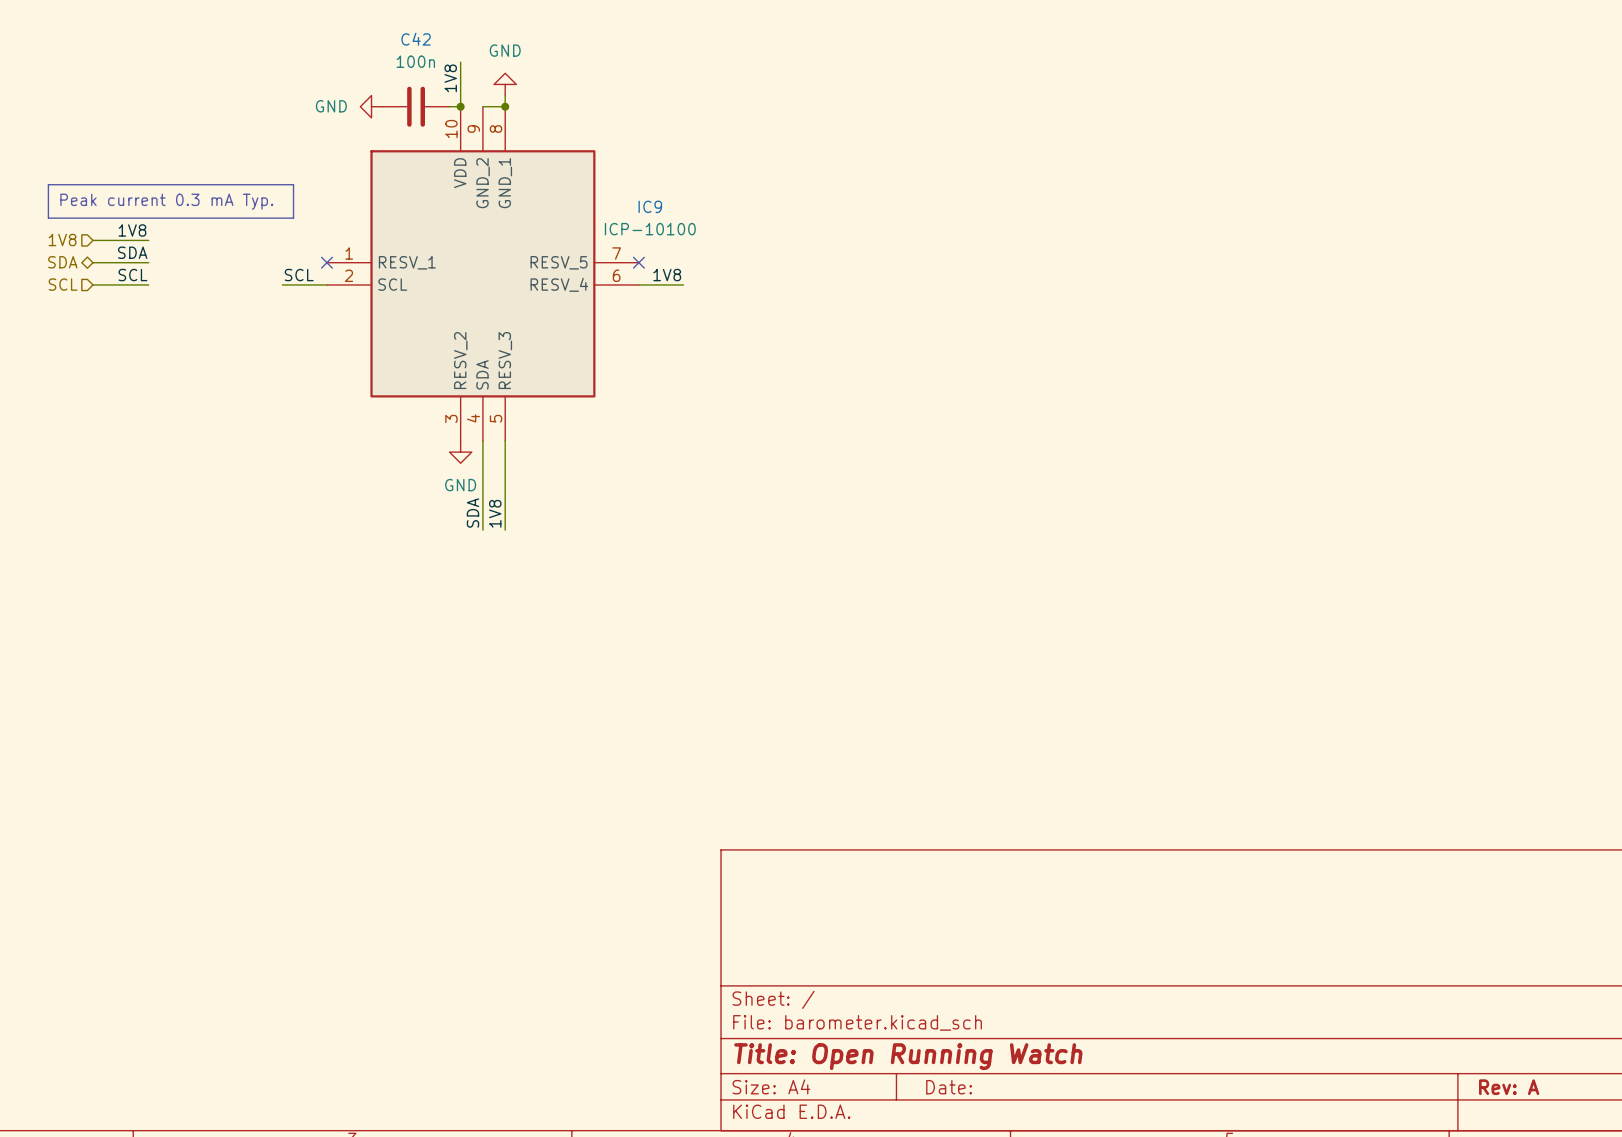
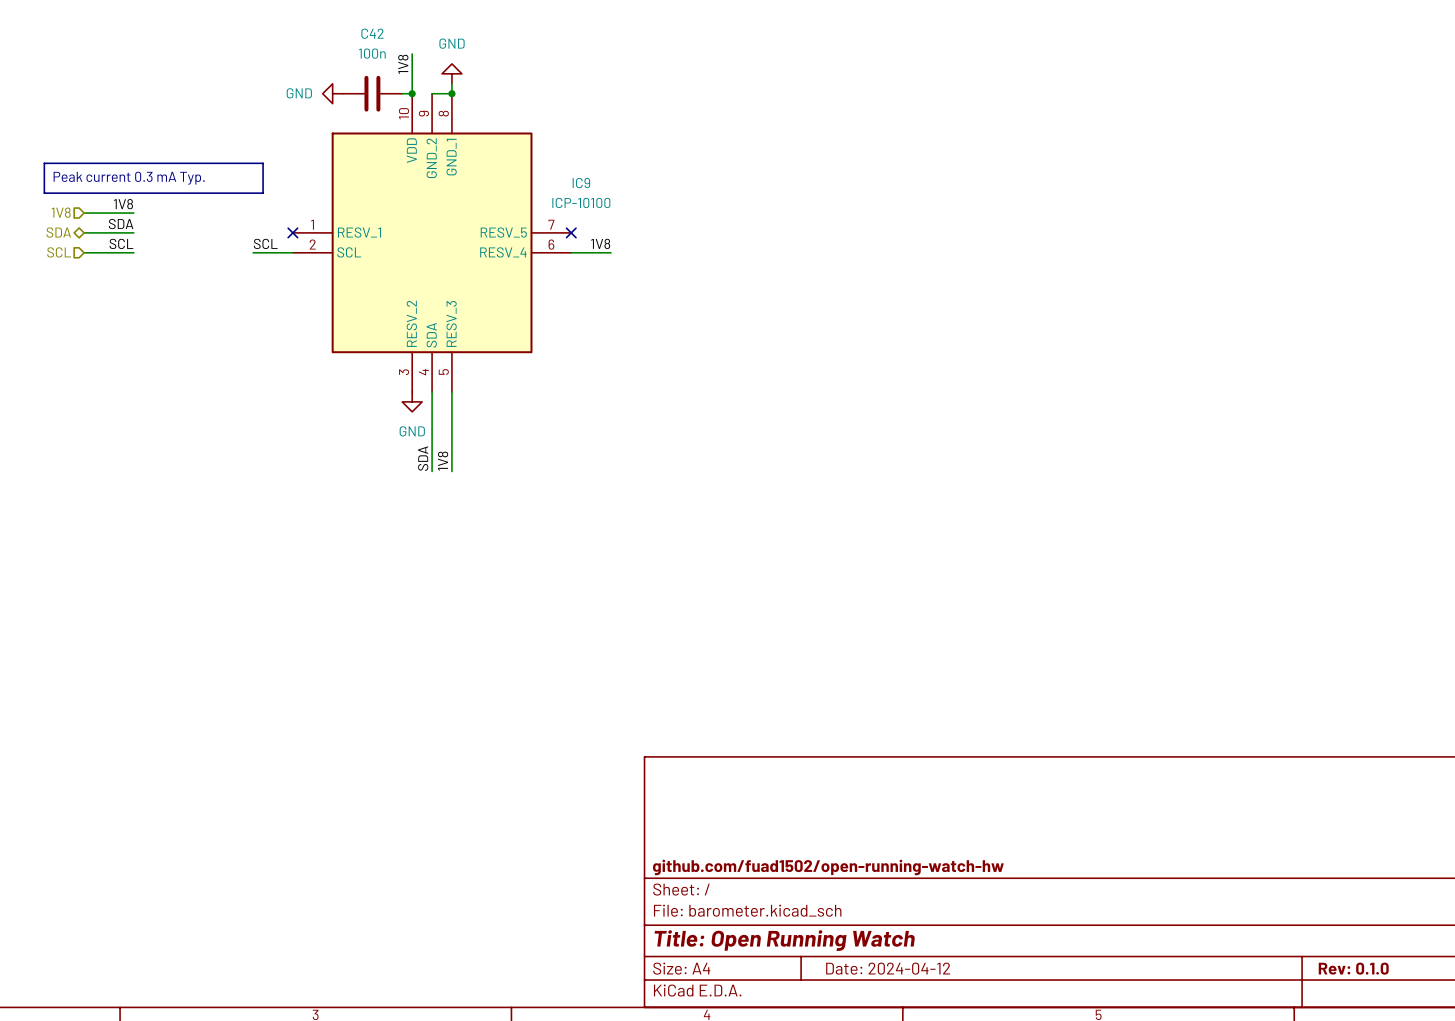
title block: none -> github.com/fuad1502/open-running-watch-hw (828, 867)
title block: Date: (949, 1087) -> Date: 2024-04-12 (888, 968)
title block: Rev: A (1509, 1087) -> Rev: 0.1.0 (1353, 968)

